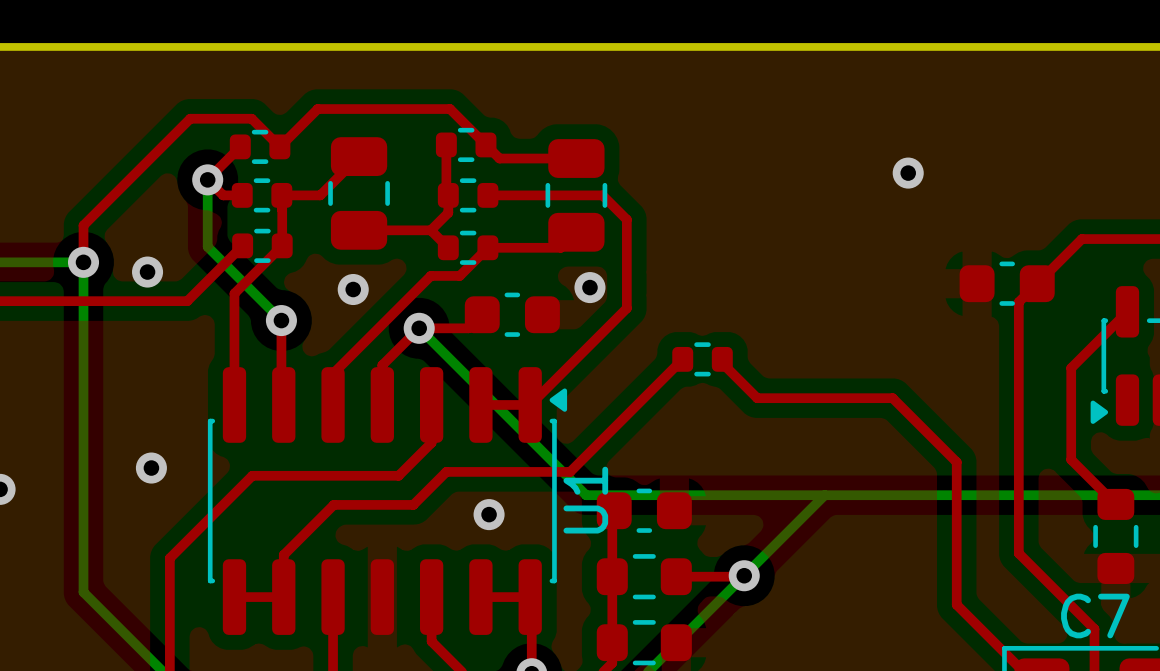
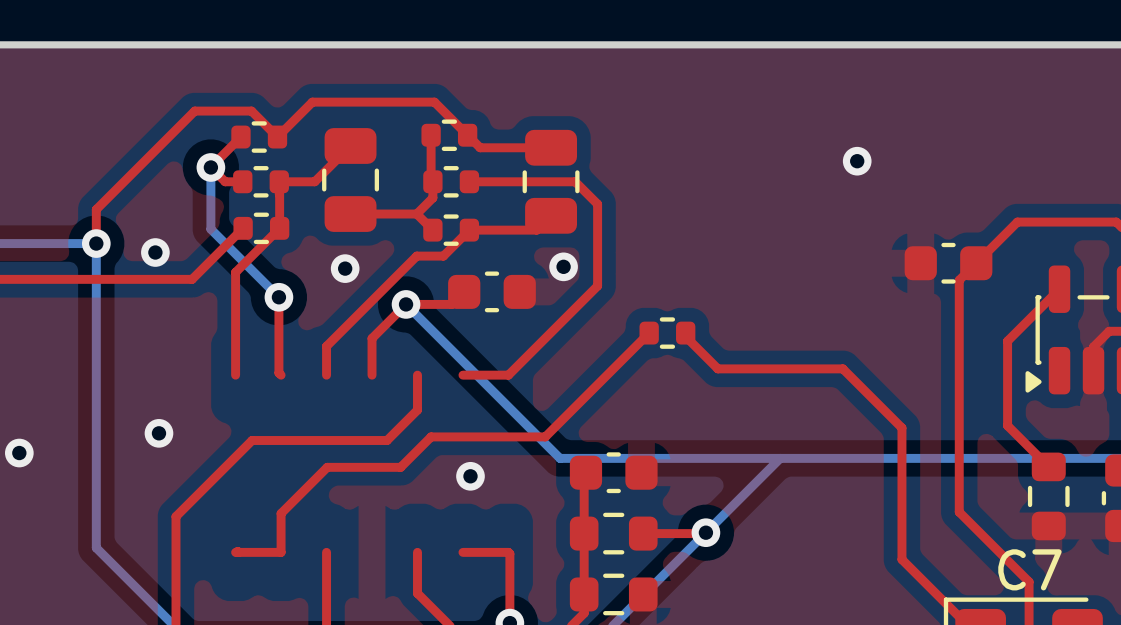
U1: (387, 501) -> none

